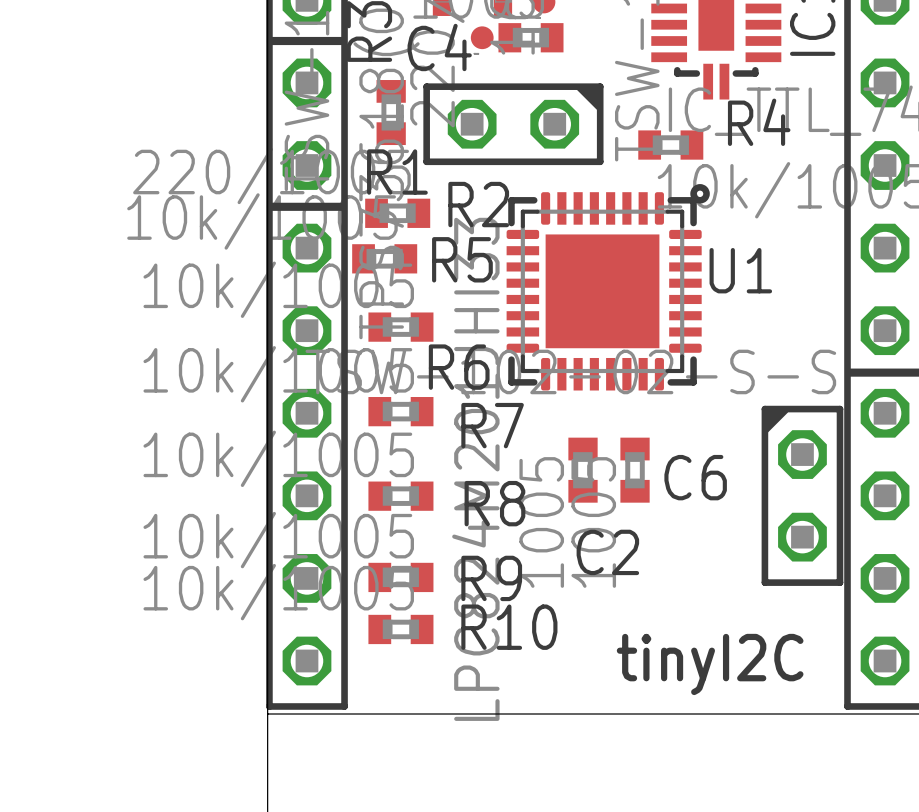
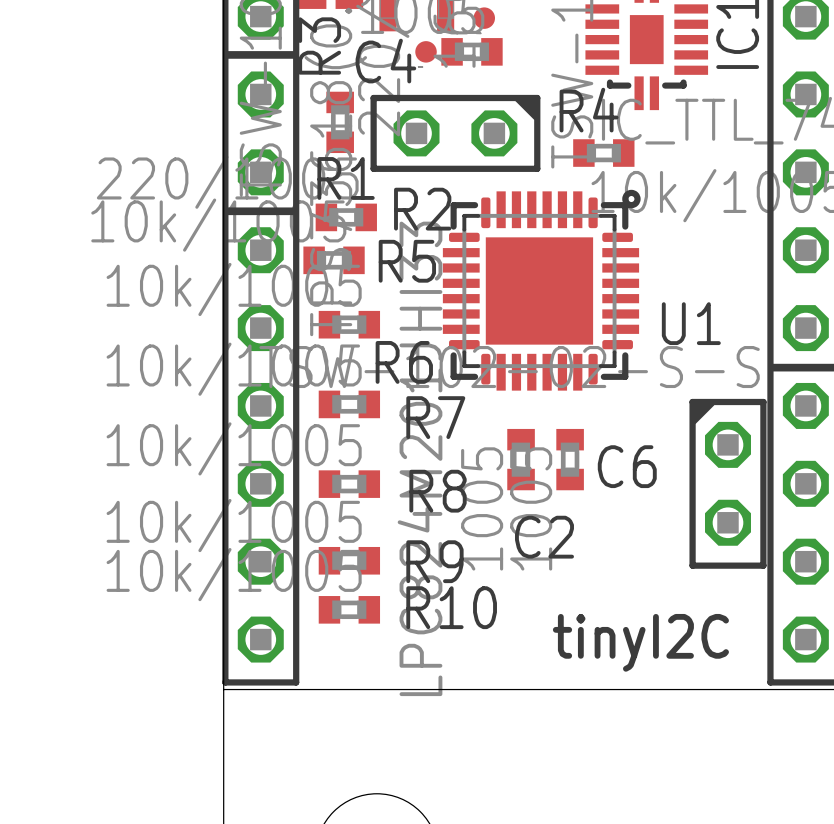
R4 name position: R4 (759, 122) -> R4 (589, 110)
U1 footprint: [506, 184, 710, 391] -> [442, 189, 641, 391]
U1 name position: U1 (740, 270) -> U1 (691, 323)

